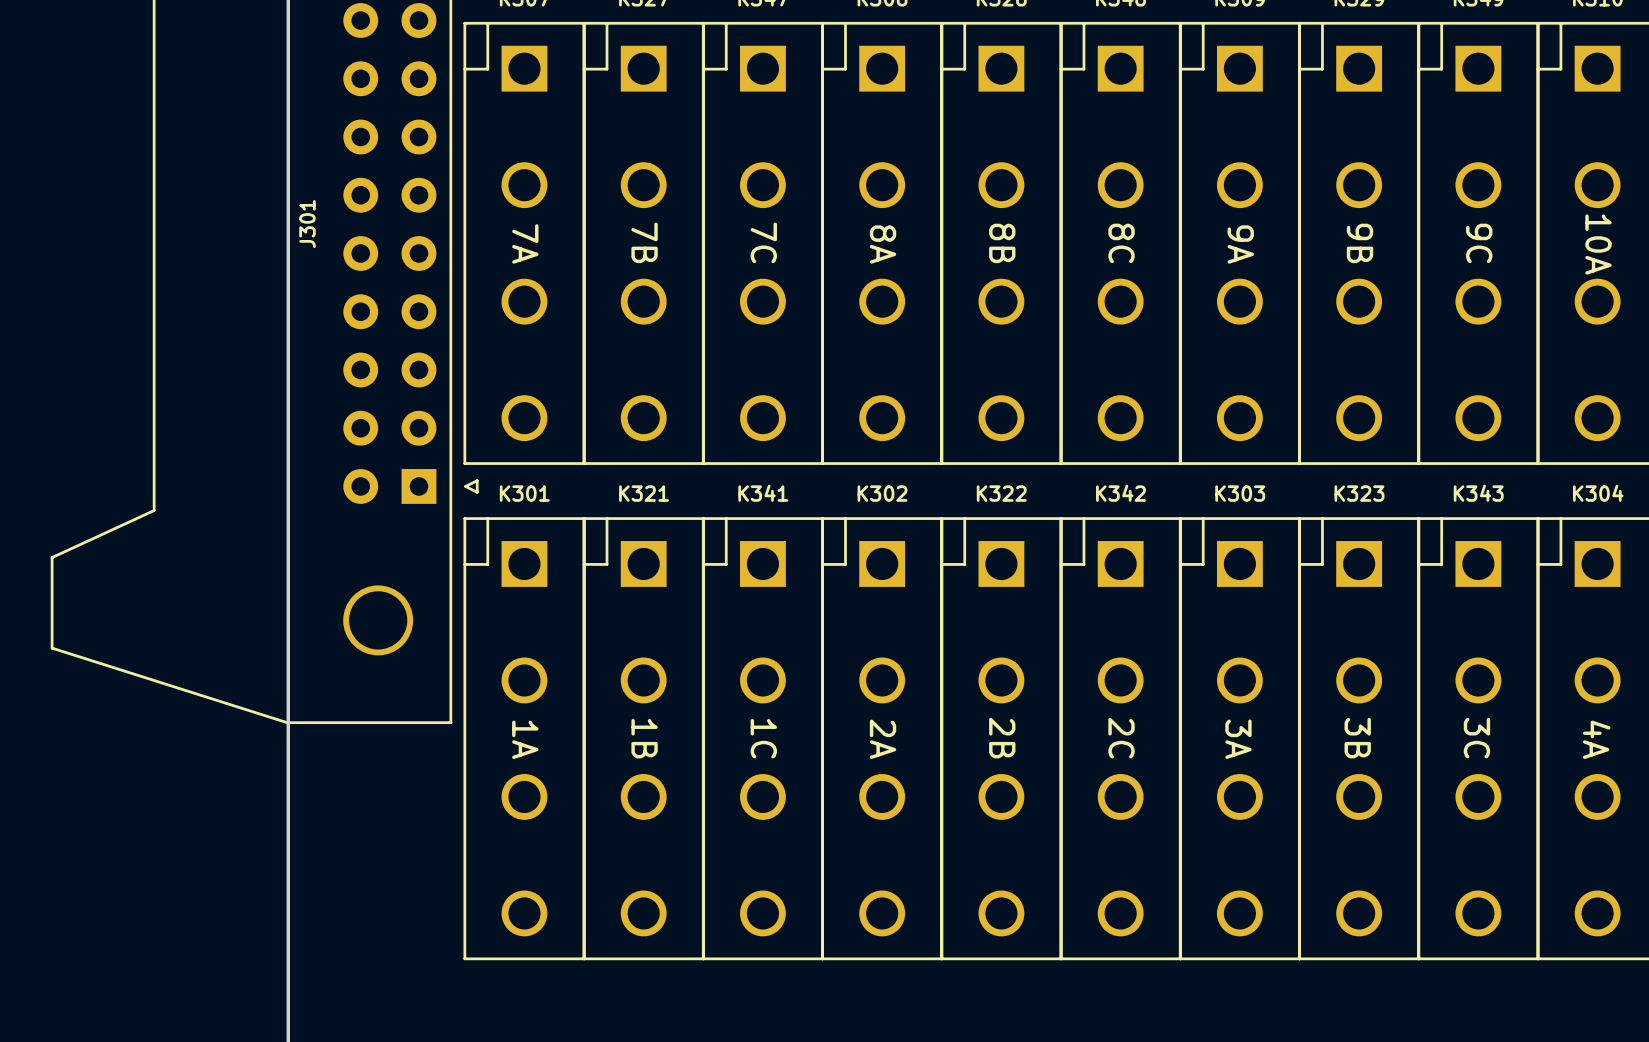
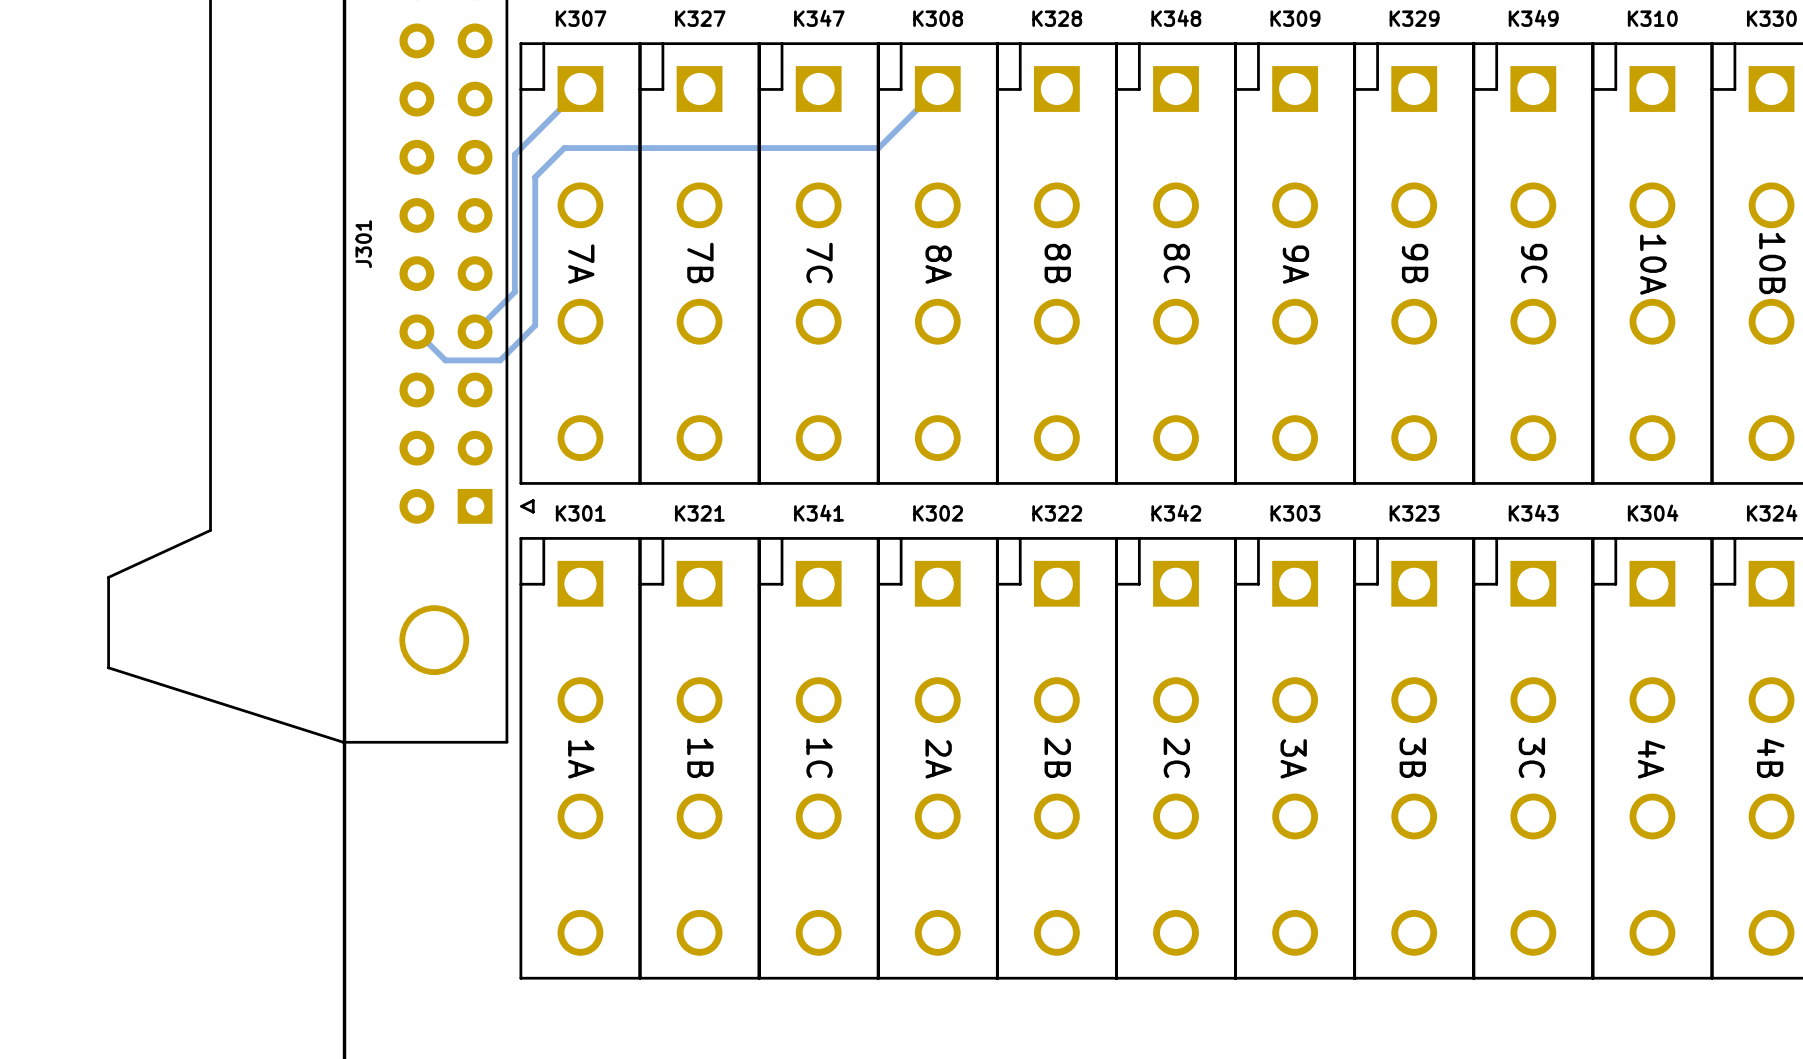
bottom track: none -> (580, 89) (514, 154) (514, 292) (475, 331)
bottom track: none -> (937, 89) (878, 148) (564, 148) (535, 177) (535, 325) (500, 360) (445, 360) (416, 331)

